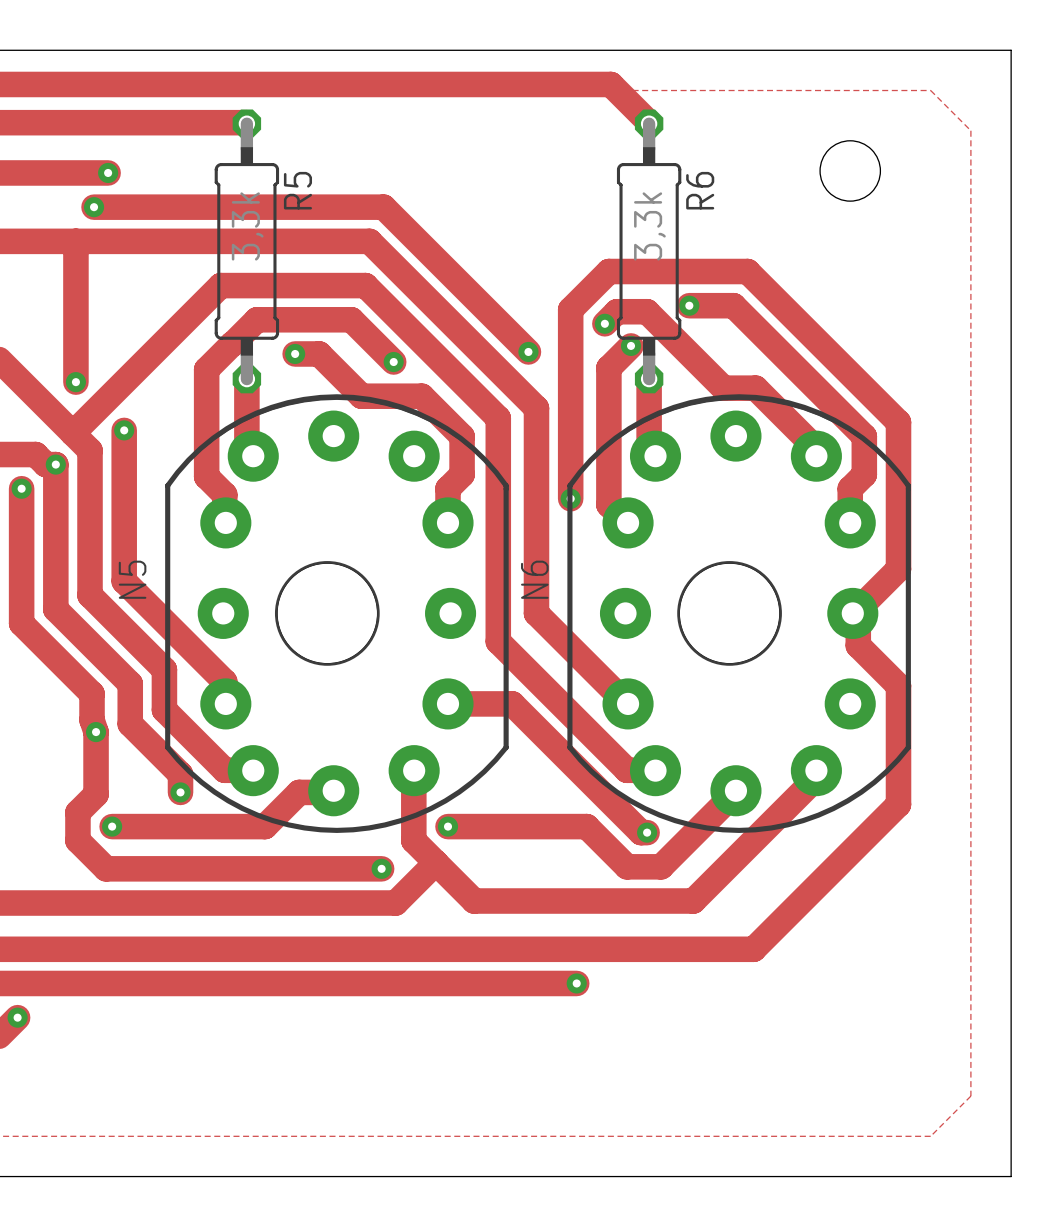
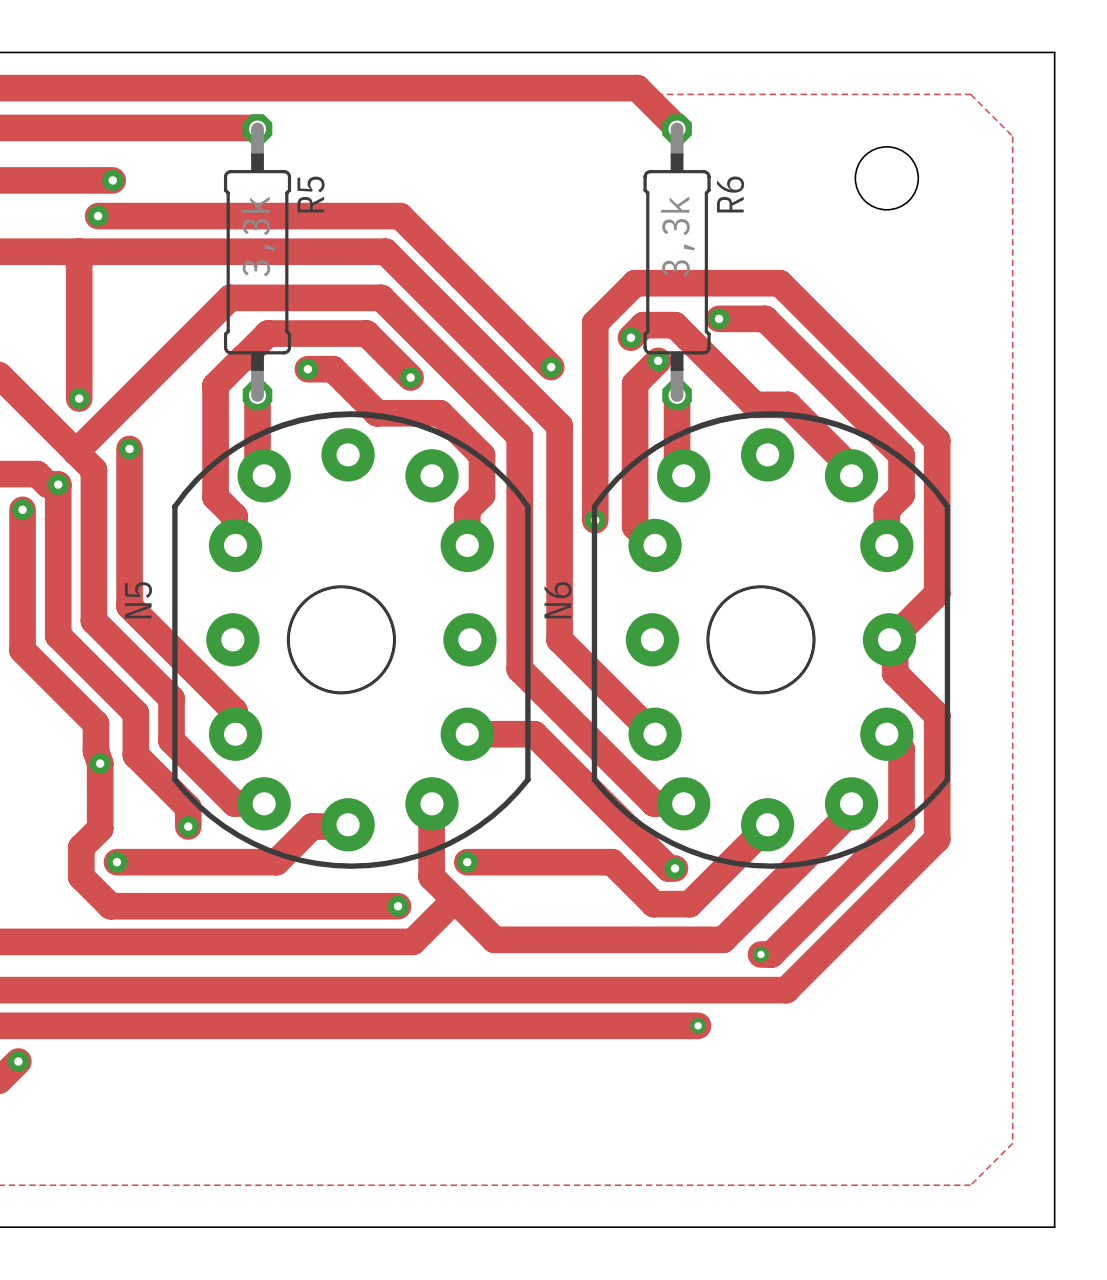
track: none -> (886, 734) (901, 748) (901, 824) (771, 954) (760, 954)
via: none -> (760, 954)
track: none -> (601, 1025) (698, 1025)
via: (576, 983) -> none
via: none -> (698, 1025)

